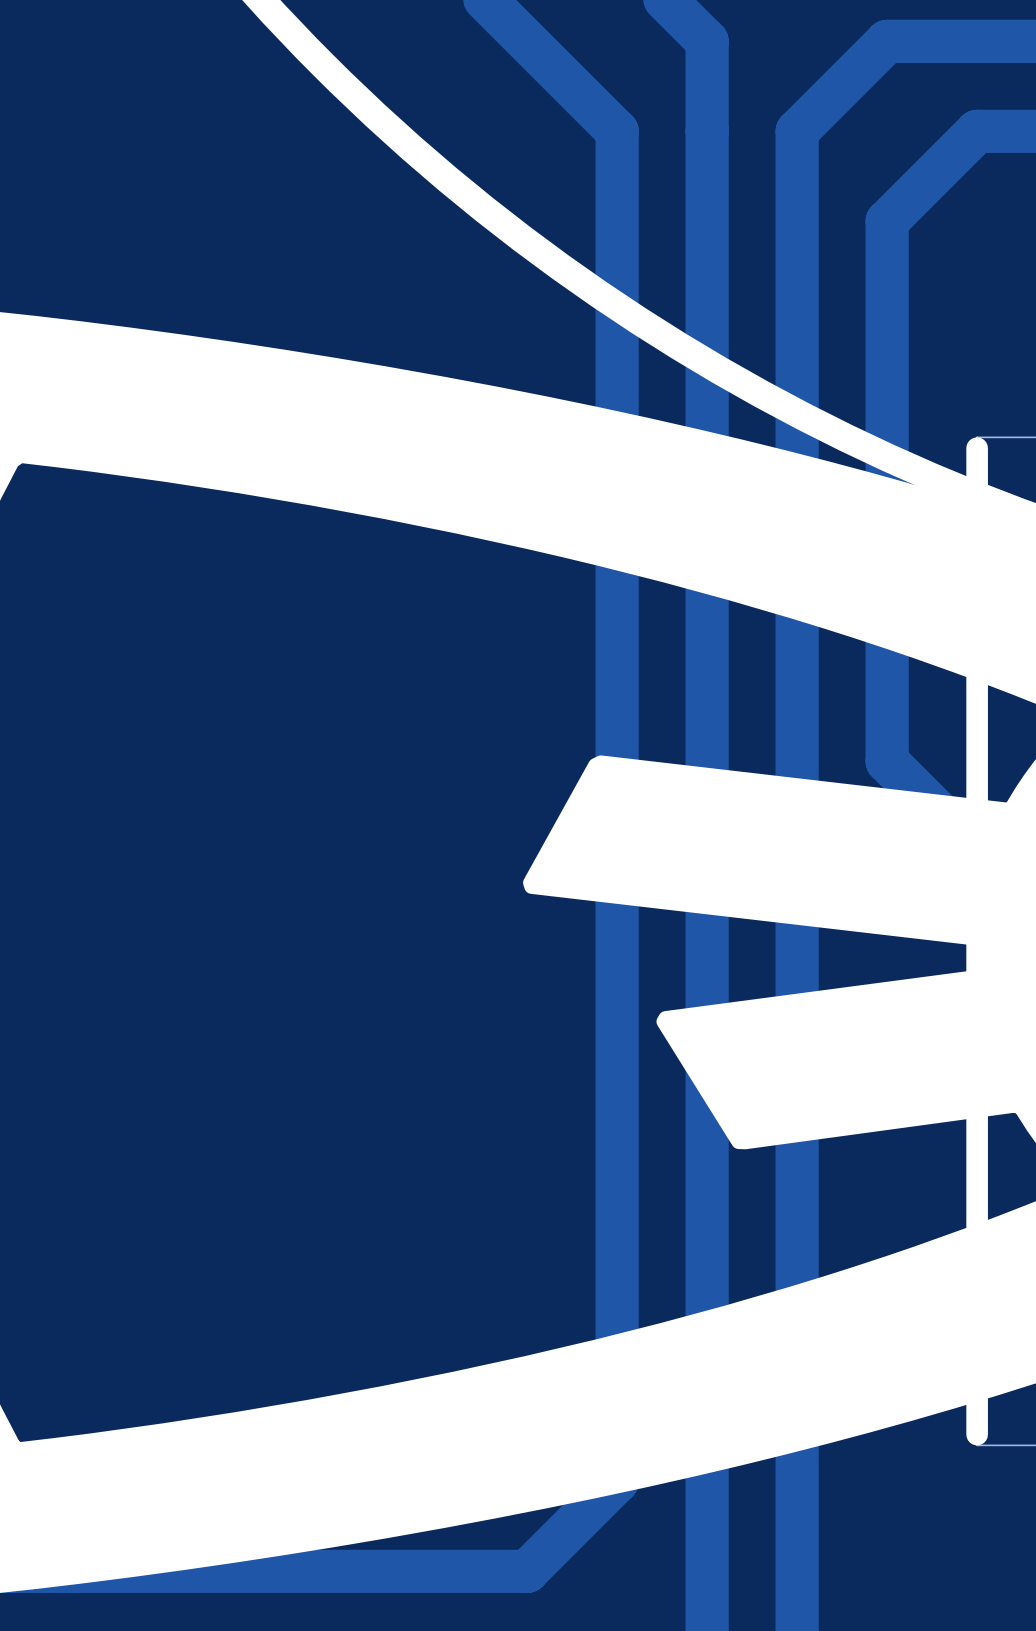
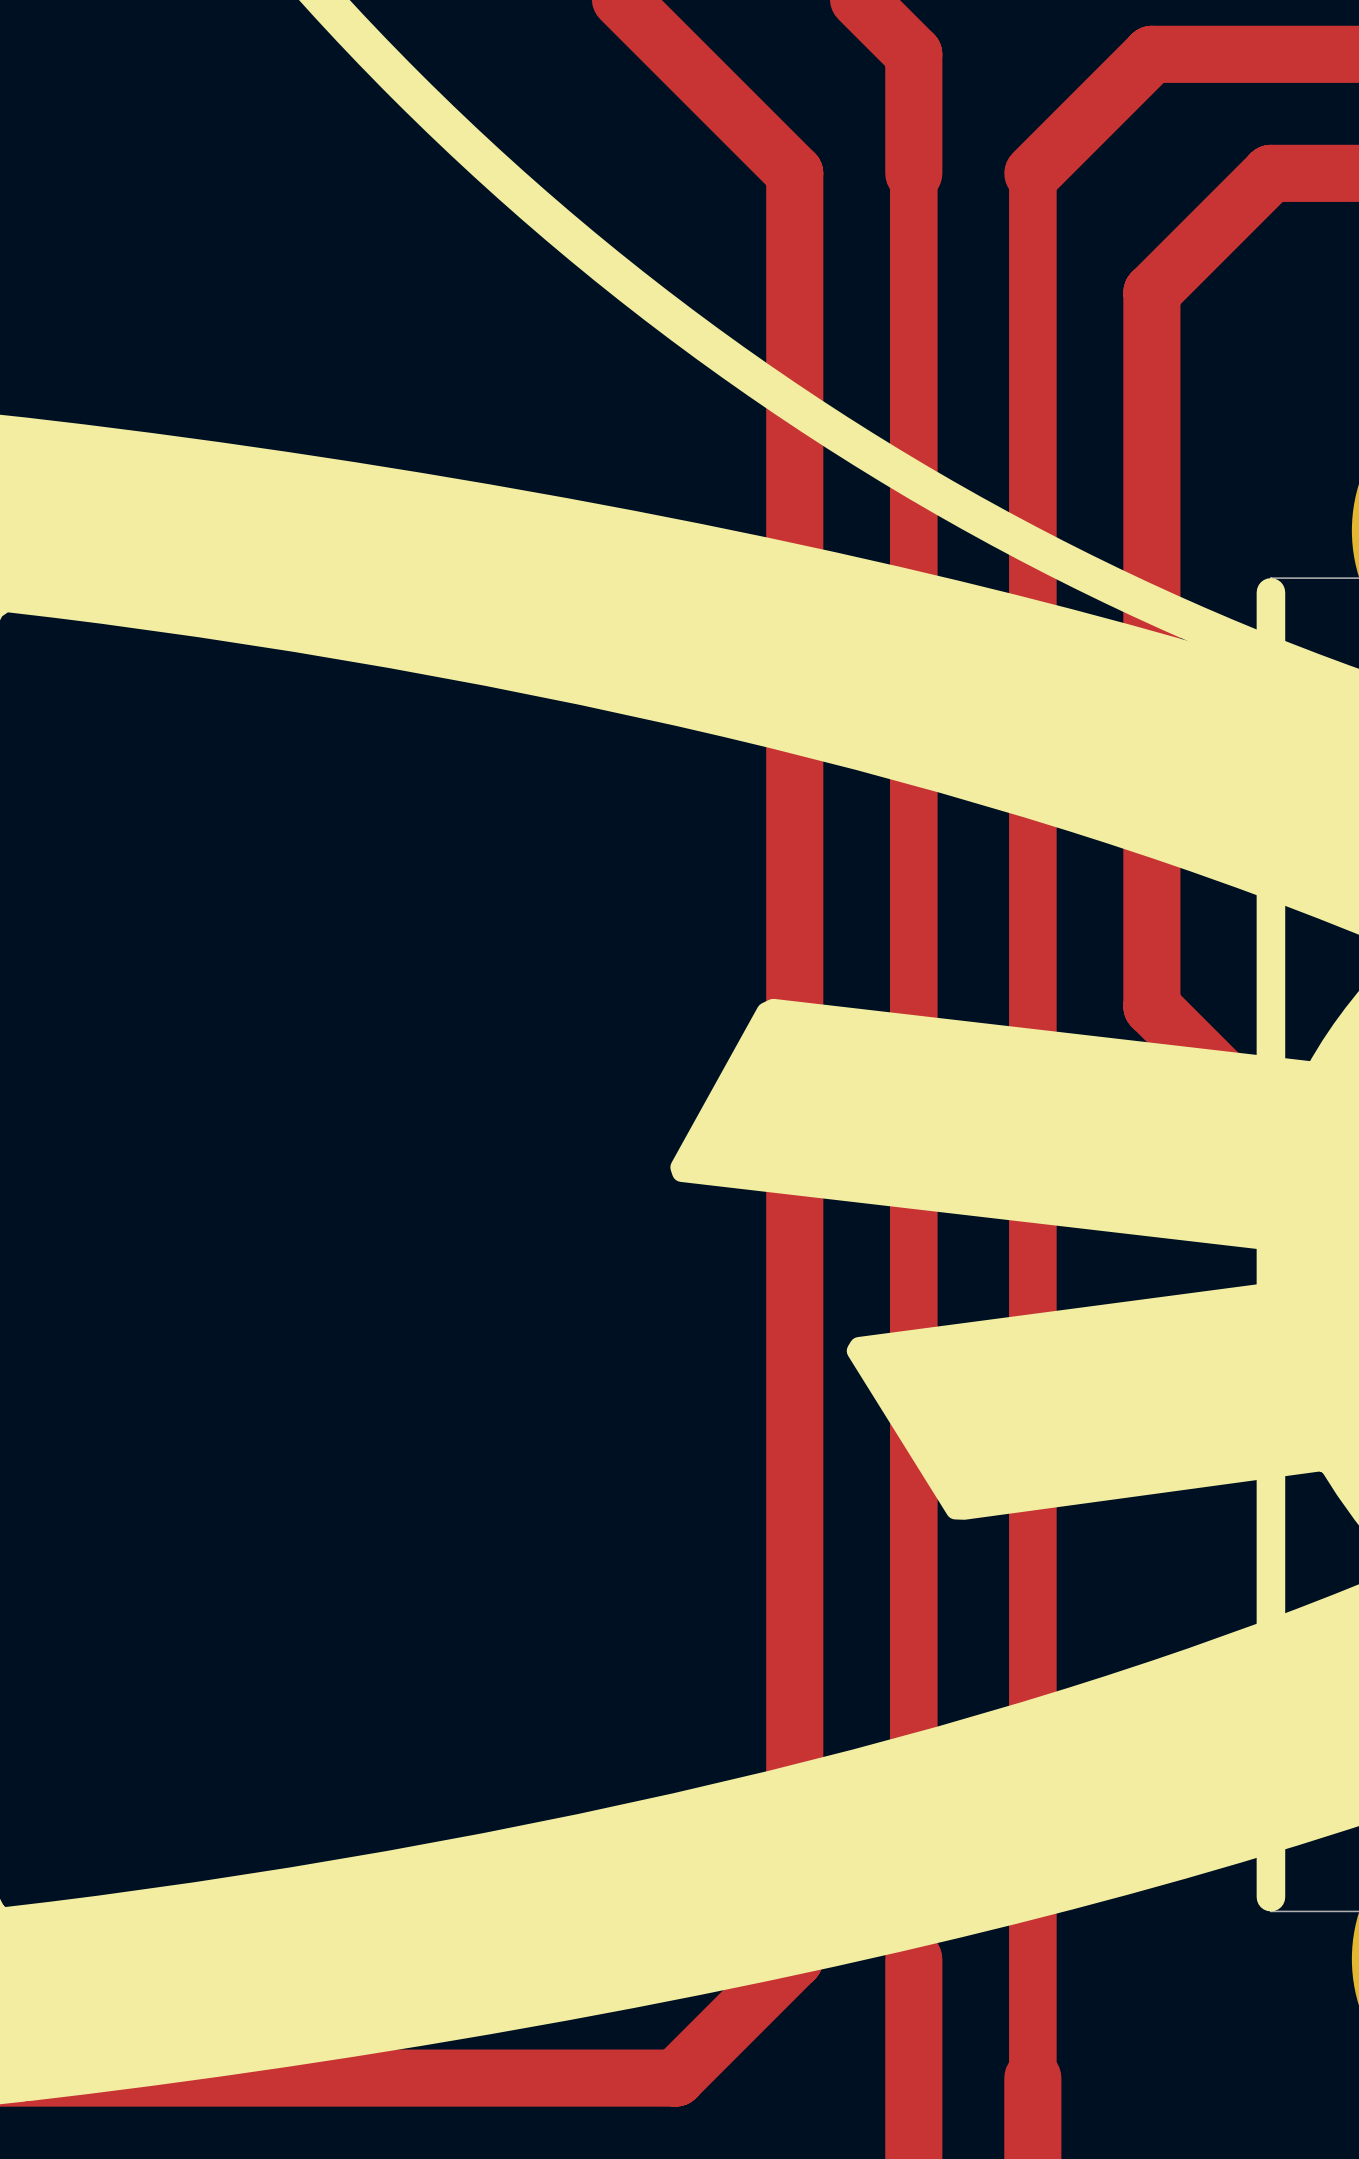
track width: thick (707, 131) (707, 1481) -> thin (913, 173) (913, 1959)
track width: thick (797, 131) (797, 1571) -> thin (1032, 173) (1032, 2078)

